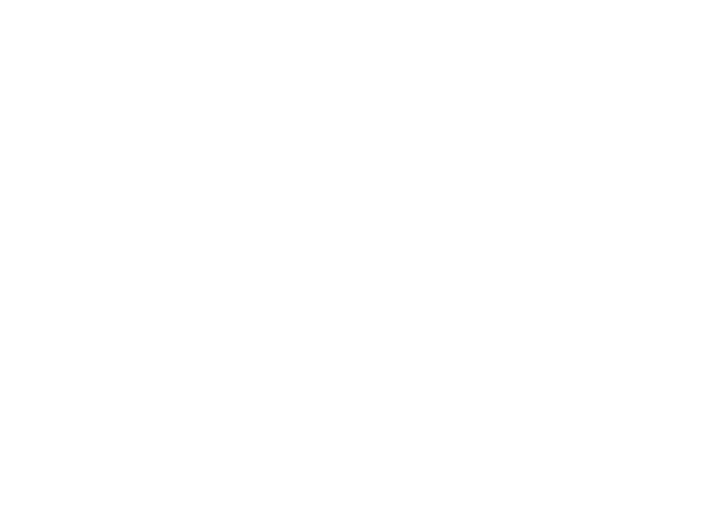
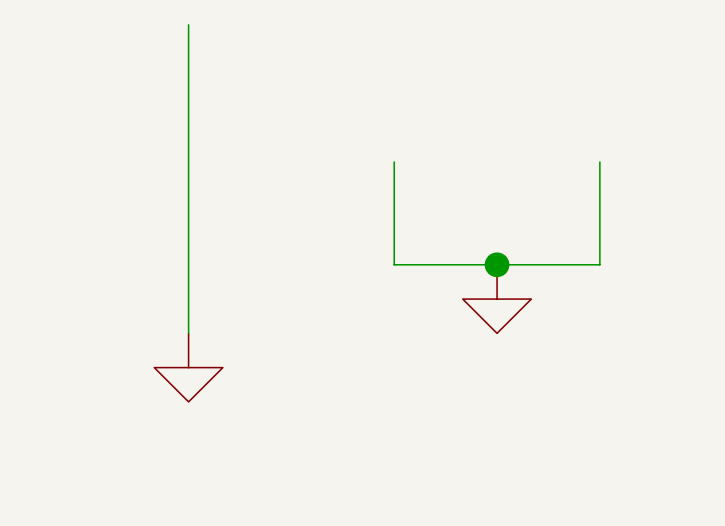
wire: none -> (188, 24) (188, 333)
wire: none -> (394, 161) (394, 264) (599, 264) (599, 161)
junction: none -> (497, 264)
power symbol: none -> (497, 299)
power symbol: none -> (188, 367)

